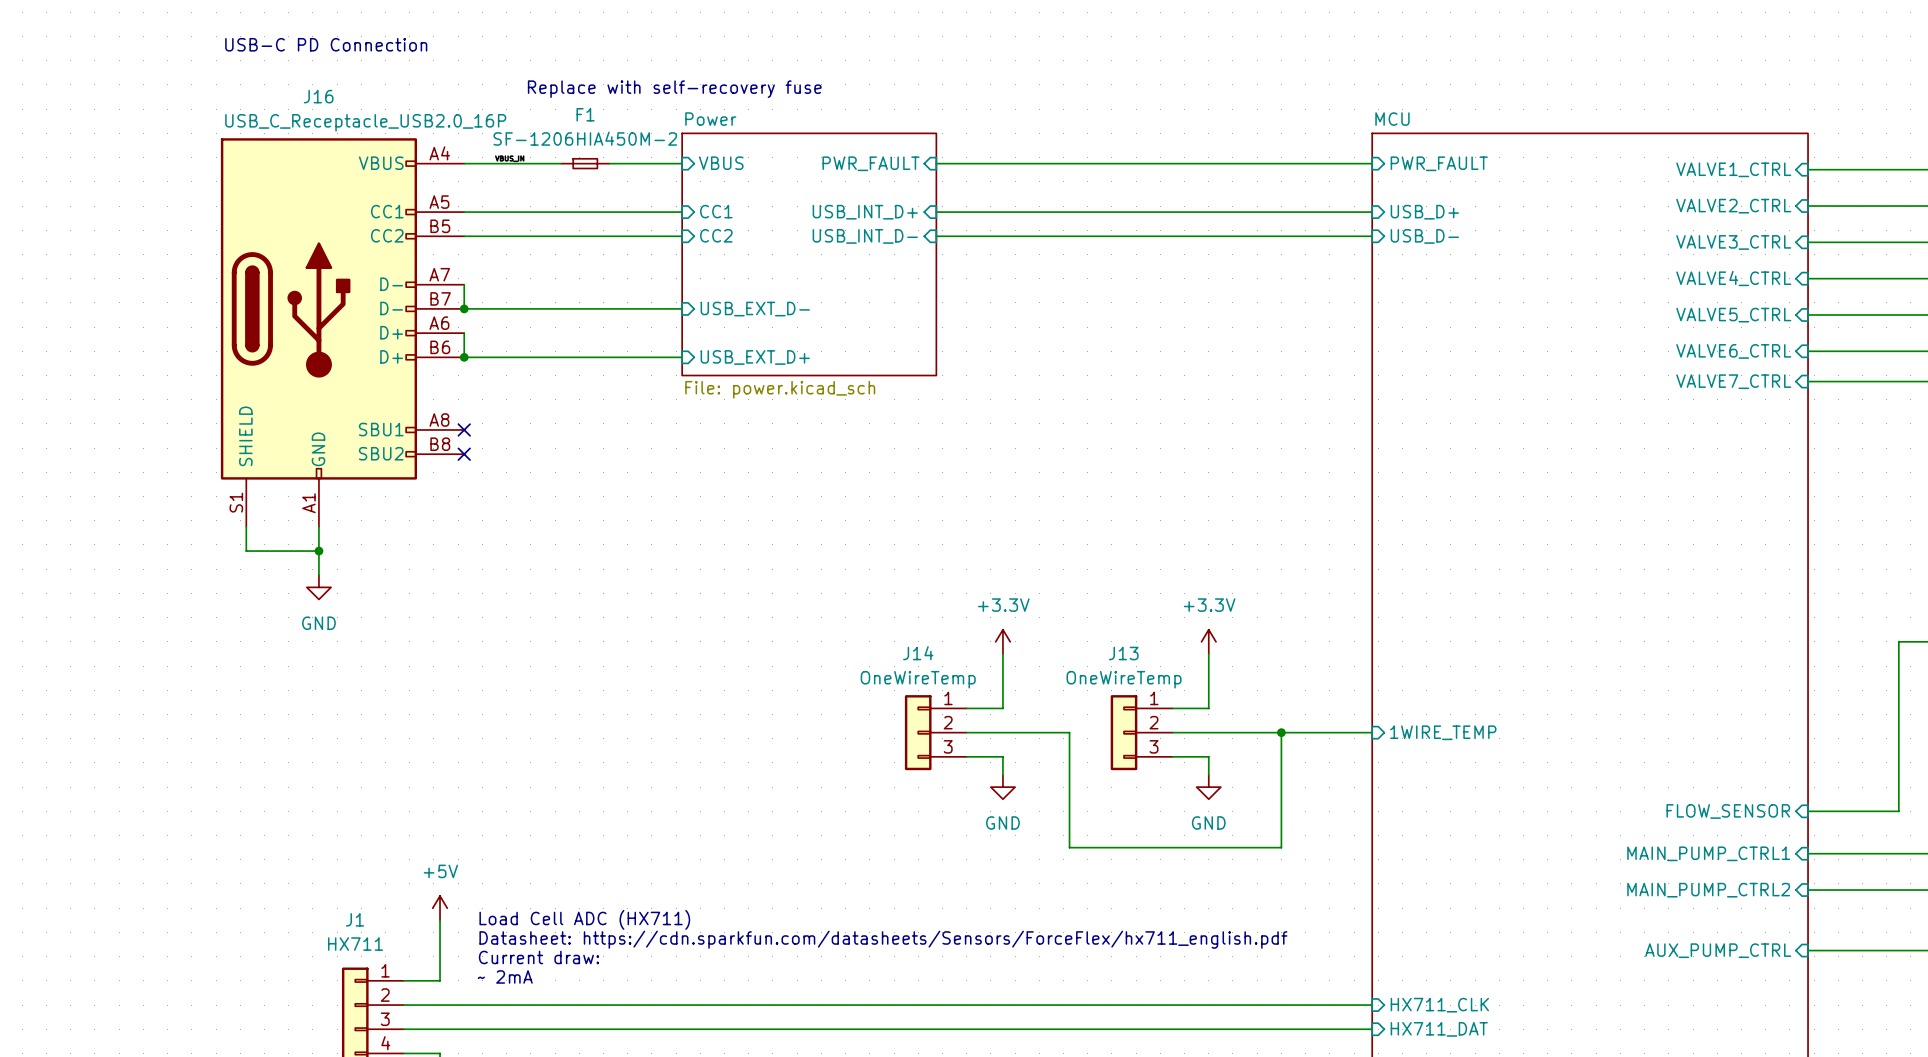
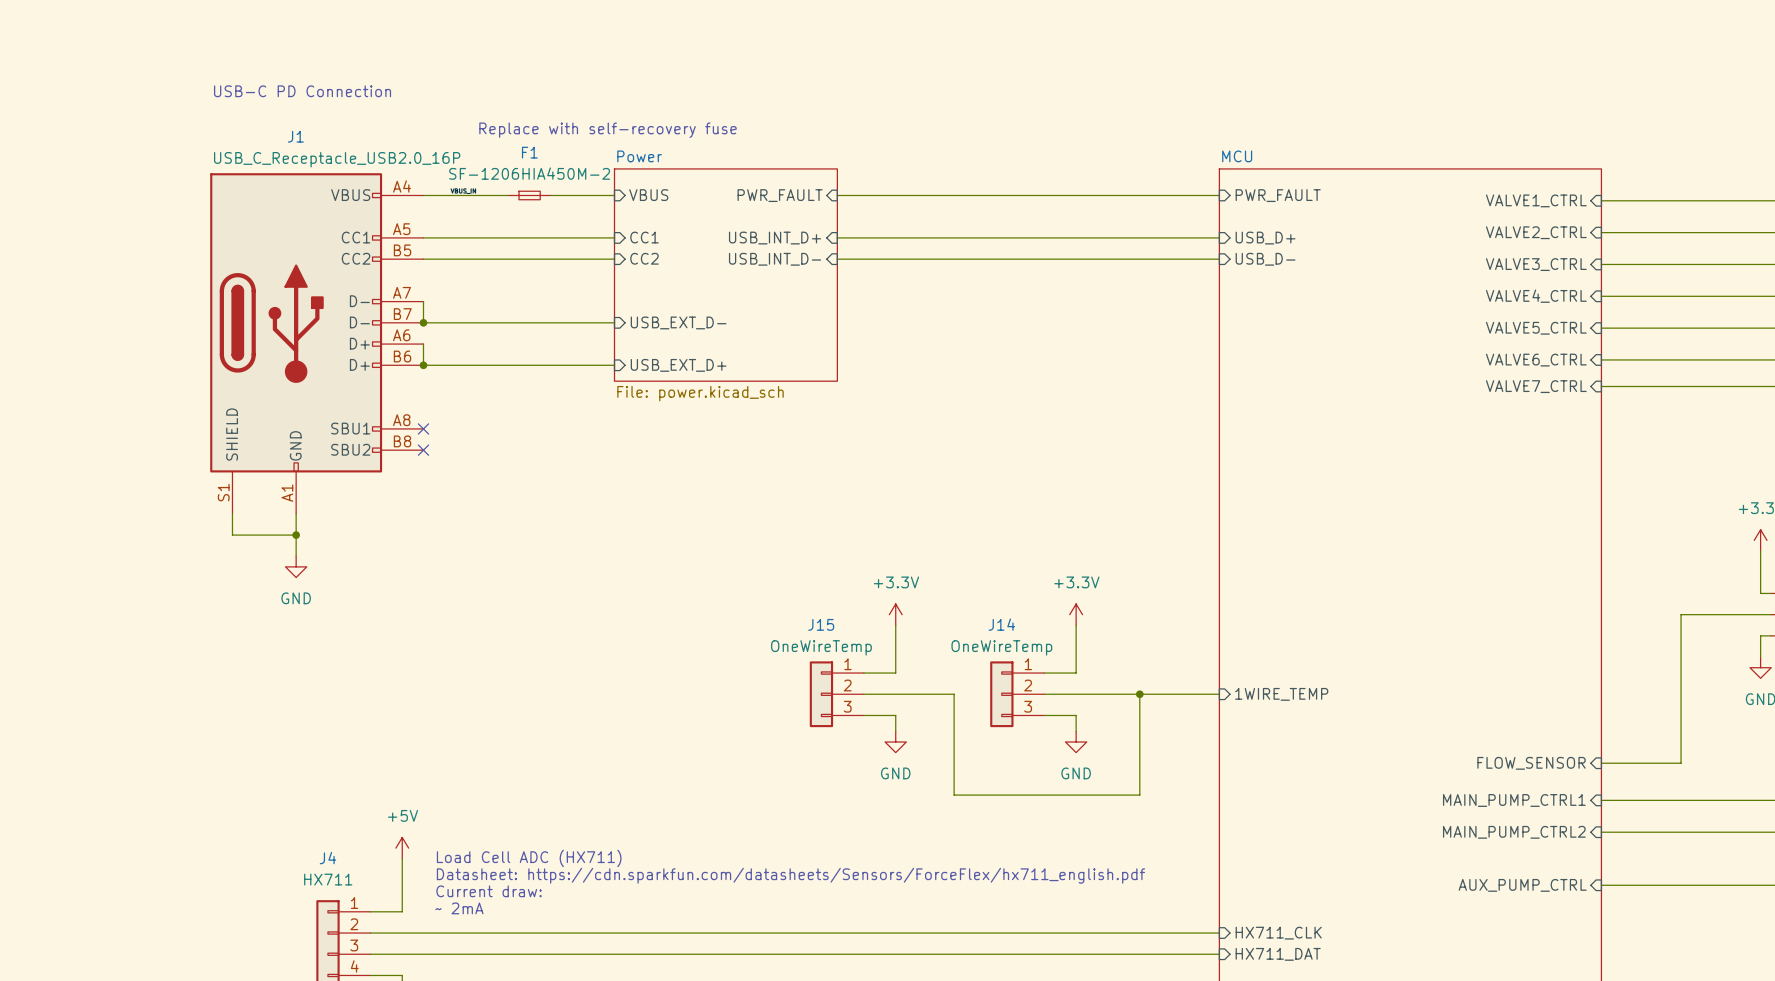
J16 name: J16 (318, 96) -> J1 (295, 136)
J14 name: J14 (918, 653) -> J15 (821, 624)
J13 name: J13 (1123, 653) -> J14 (1001, 624)
J1 name: J1 (354, 919) -> J4 (327, 858)

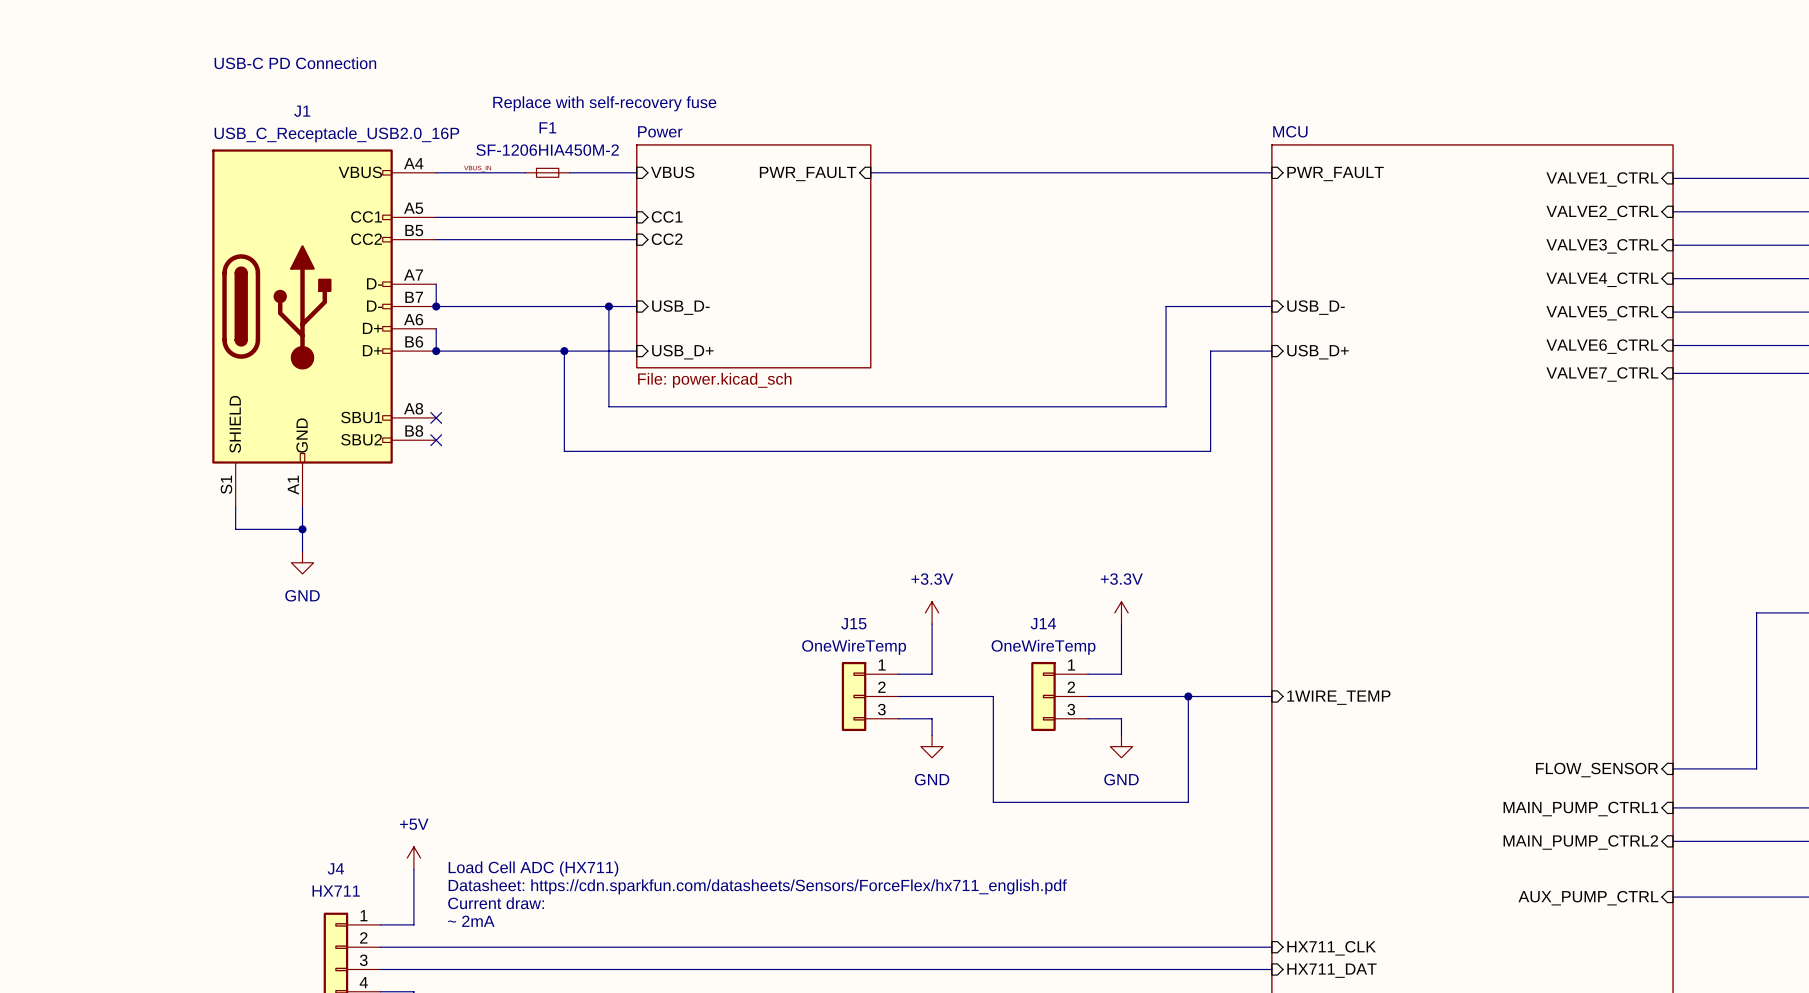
wire: (837, 237) (1219, 237) -> none
sheet pin: USB_INT_D+ (775, 238) -> none
sheet pin position: USB_D+ (1265, 238) -> USB_D+ (1318, 352)
sheet pin: USB_INT_D- (775, 259) -> none
wire: (837, 259) (1219, 259) -> none
sheet pin position: USB_D- (1265, 259) -> USB_D- (1316, 307)
wire: none -> (608, 306) (608, 406) (1166, 406) (1166, 306) (1271, 306)
junction: none -> (608, 306)
sheet pin: USB_EXT_D- (678, 322) -> USB_D- (680, 307)
wire: none -> (564, 351) (564, 451) (1210, 451) (1210, 351) (1271, 351)
junction: none -> (564, 351)
sheet pin: USB_EXT_D+ (678, 365) -> USB_D+ (682, 352)

